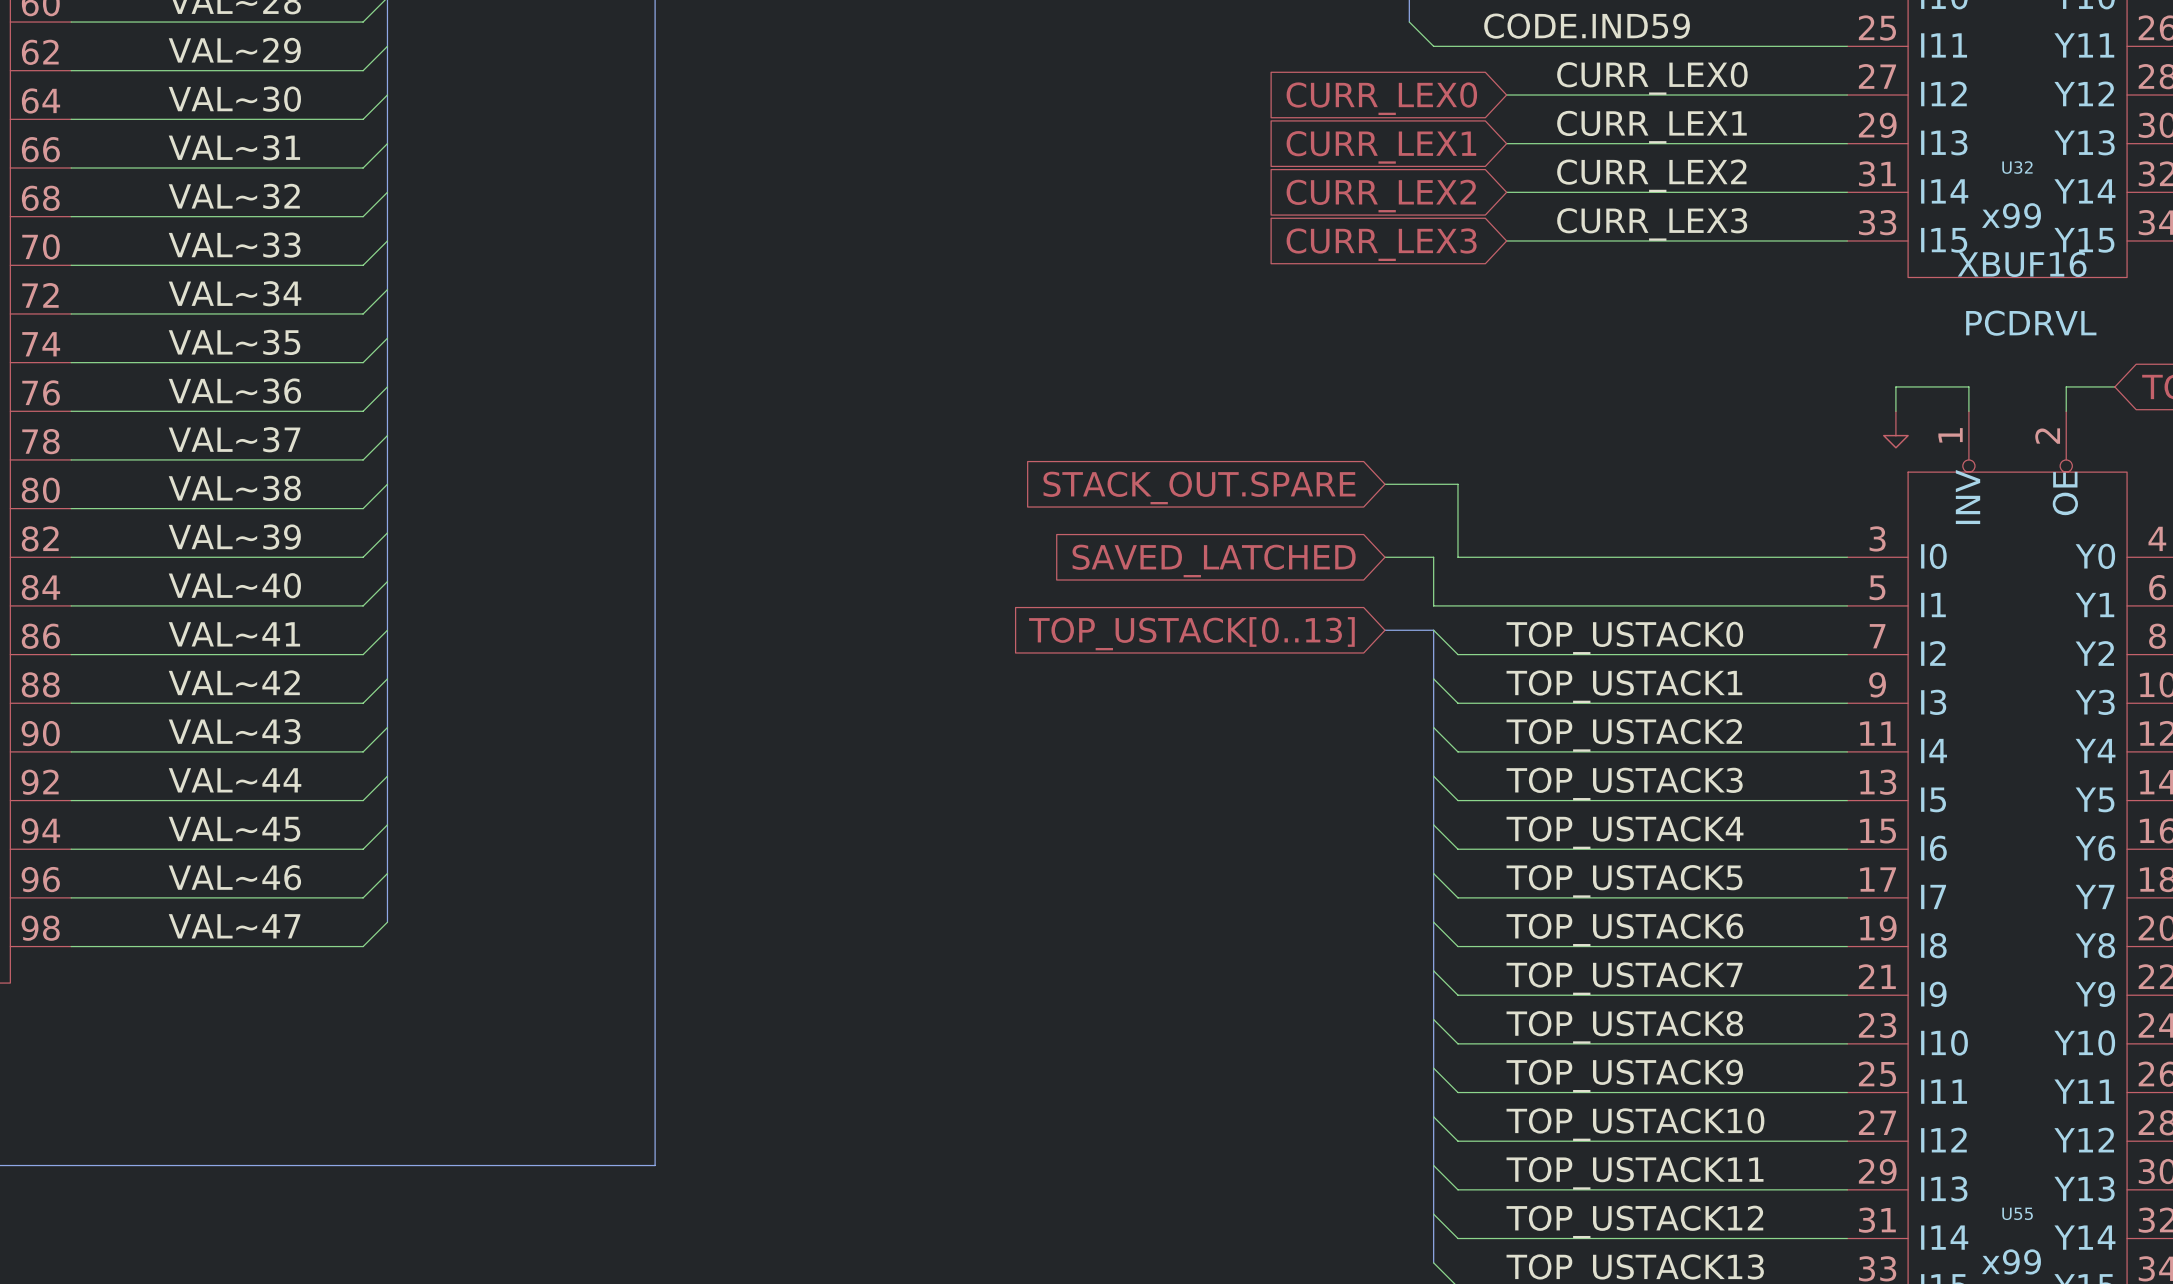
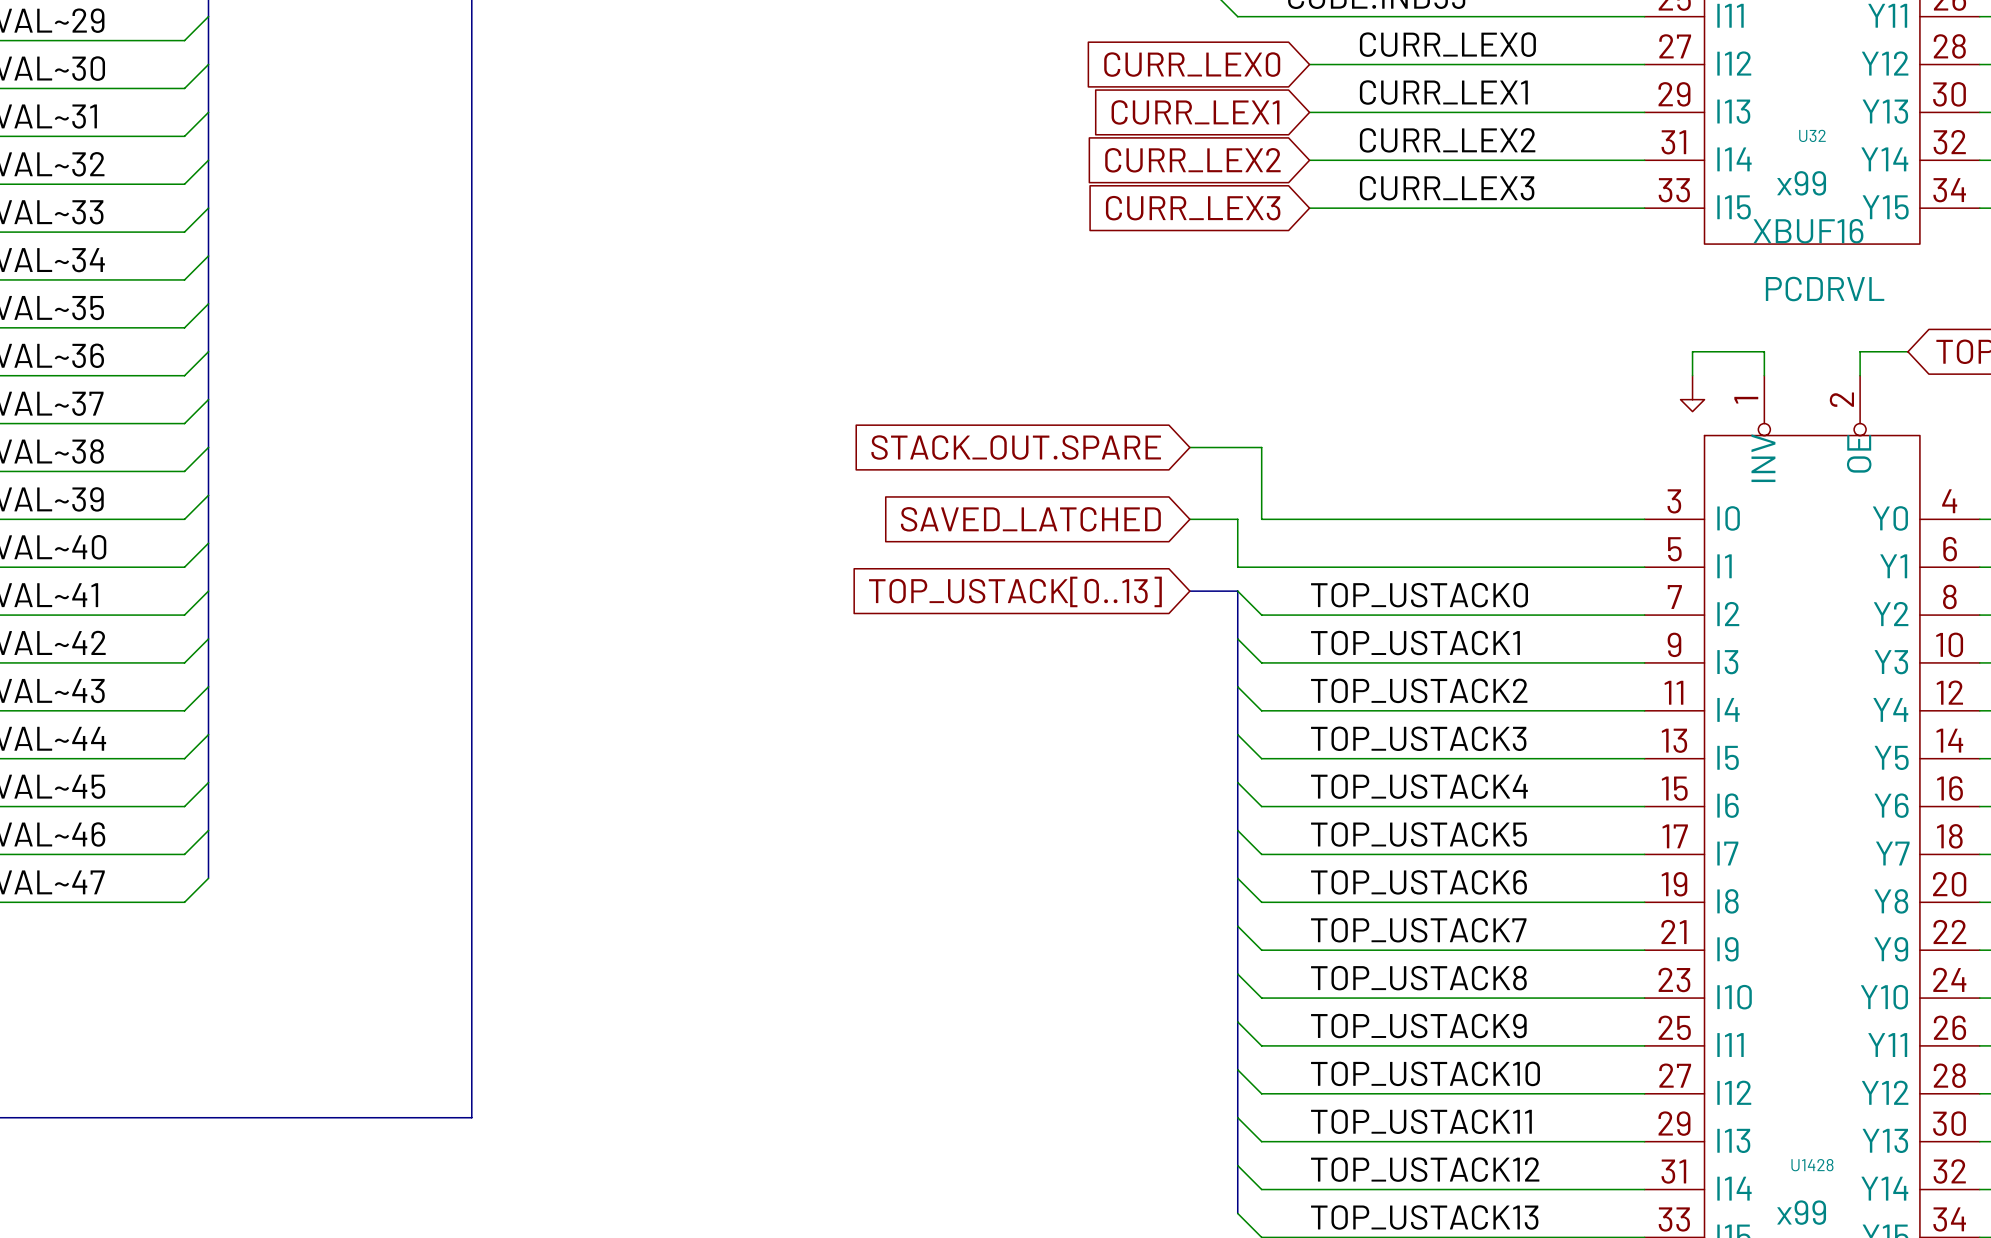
U55 name: U55 (2017, 1213) -> U1428 (1812, 1165)

